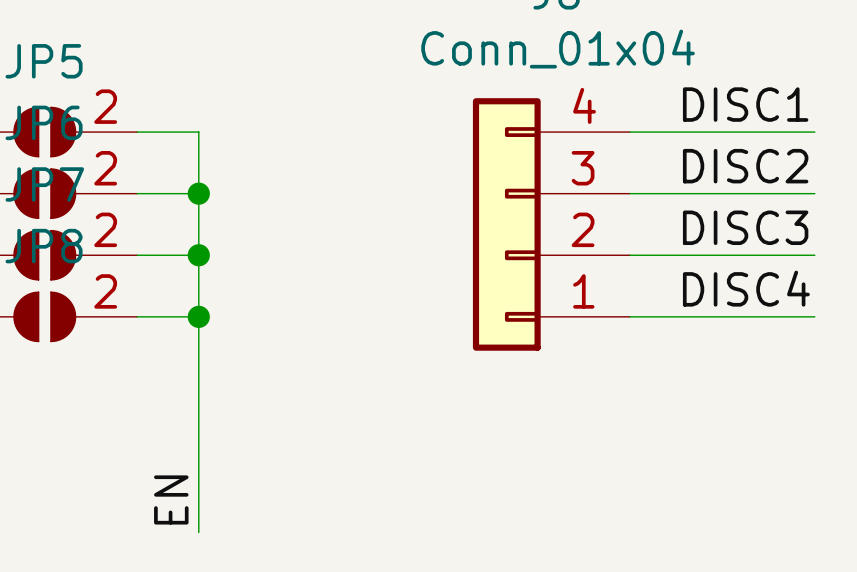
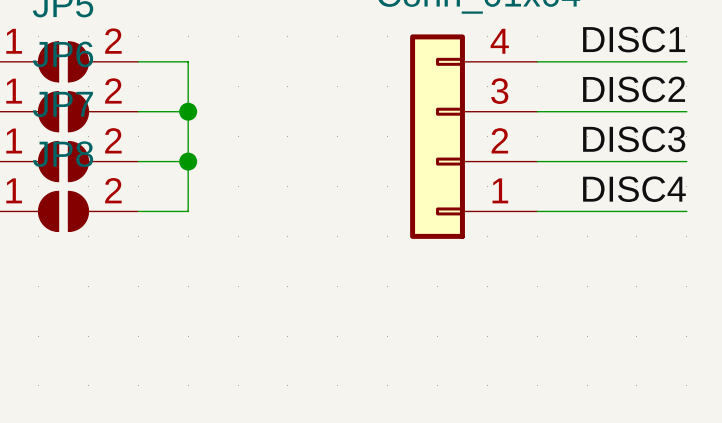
wire: (198, 316) (198, 532) -> none
junction: (198, 316) -> none
label: EN (171, 499) -> none

